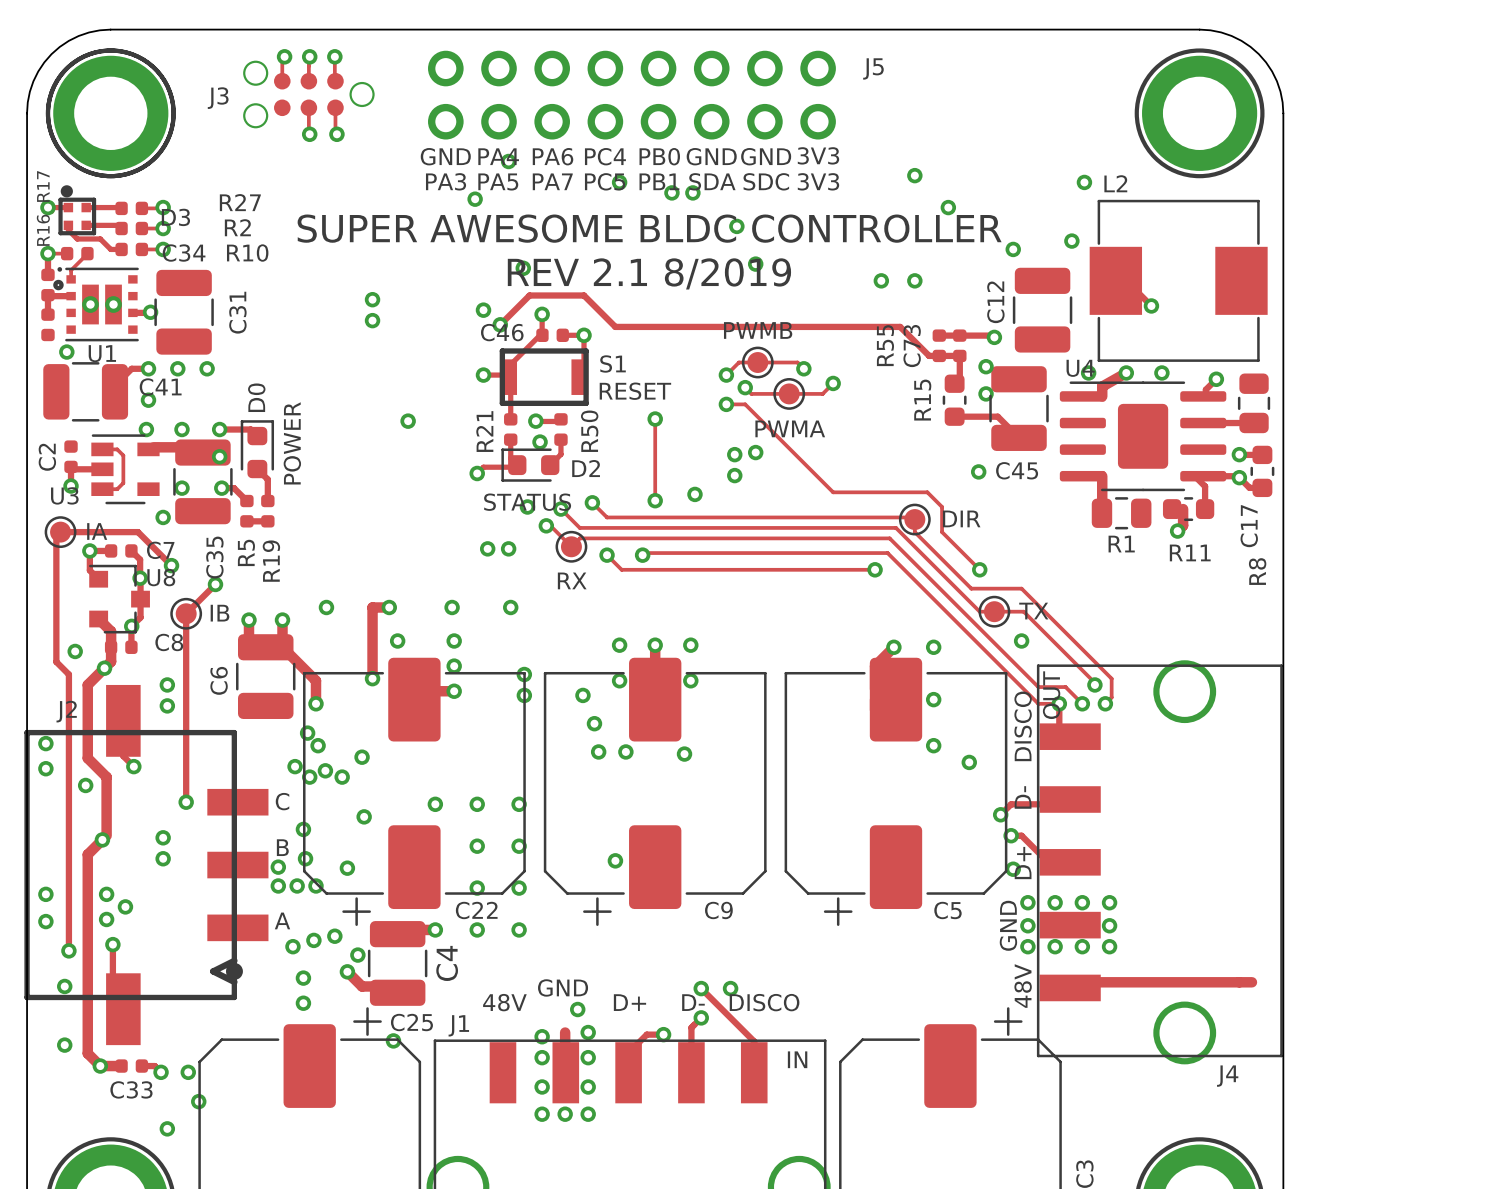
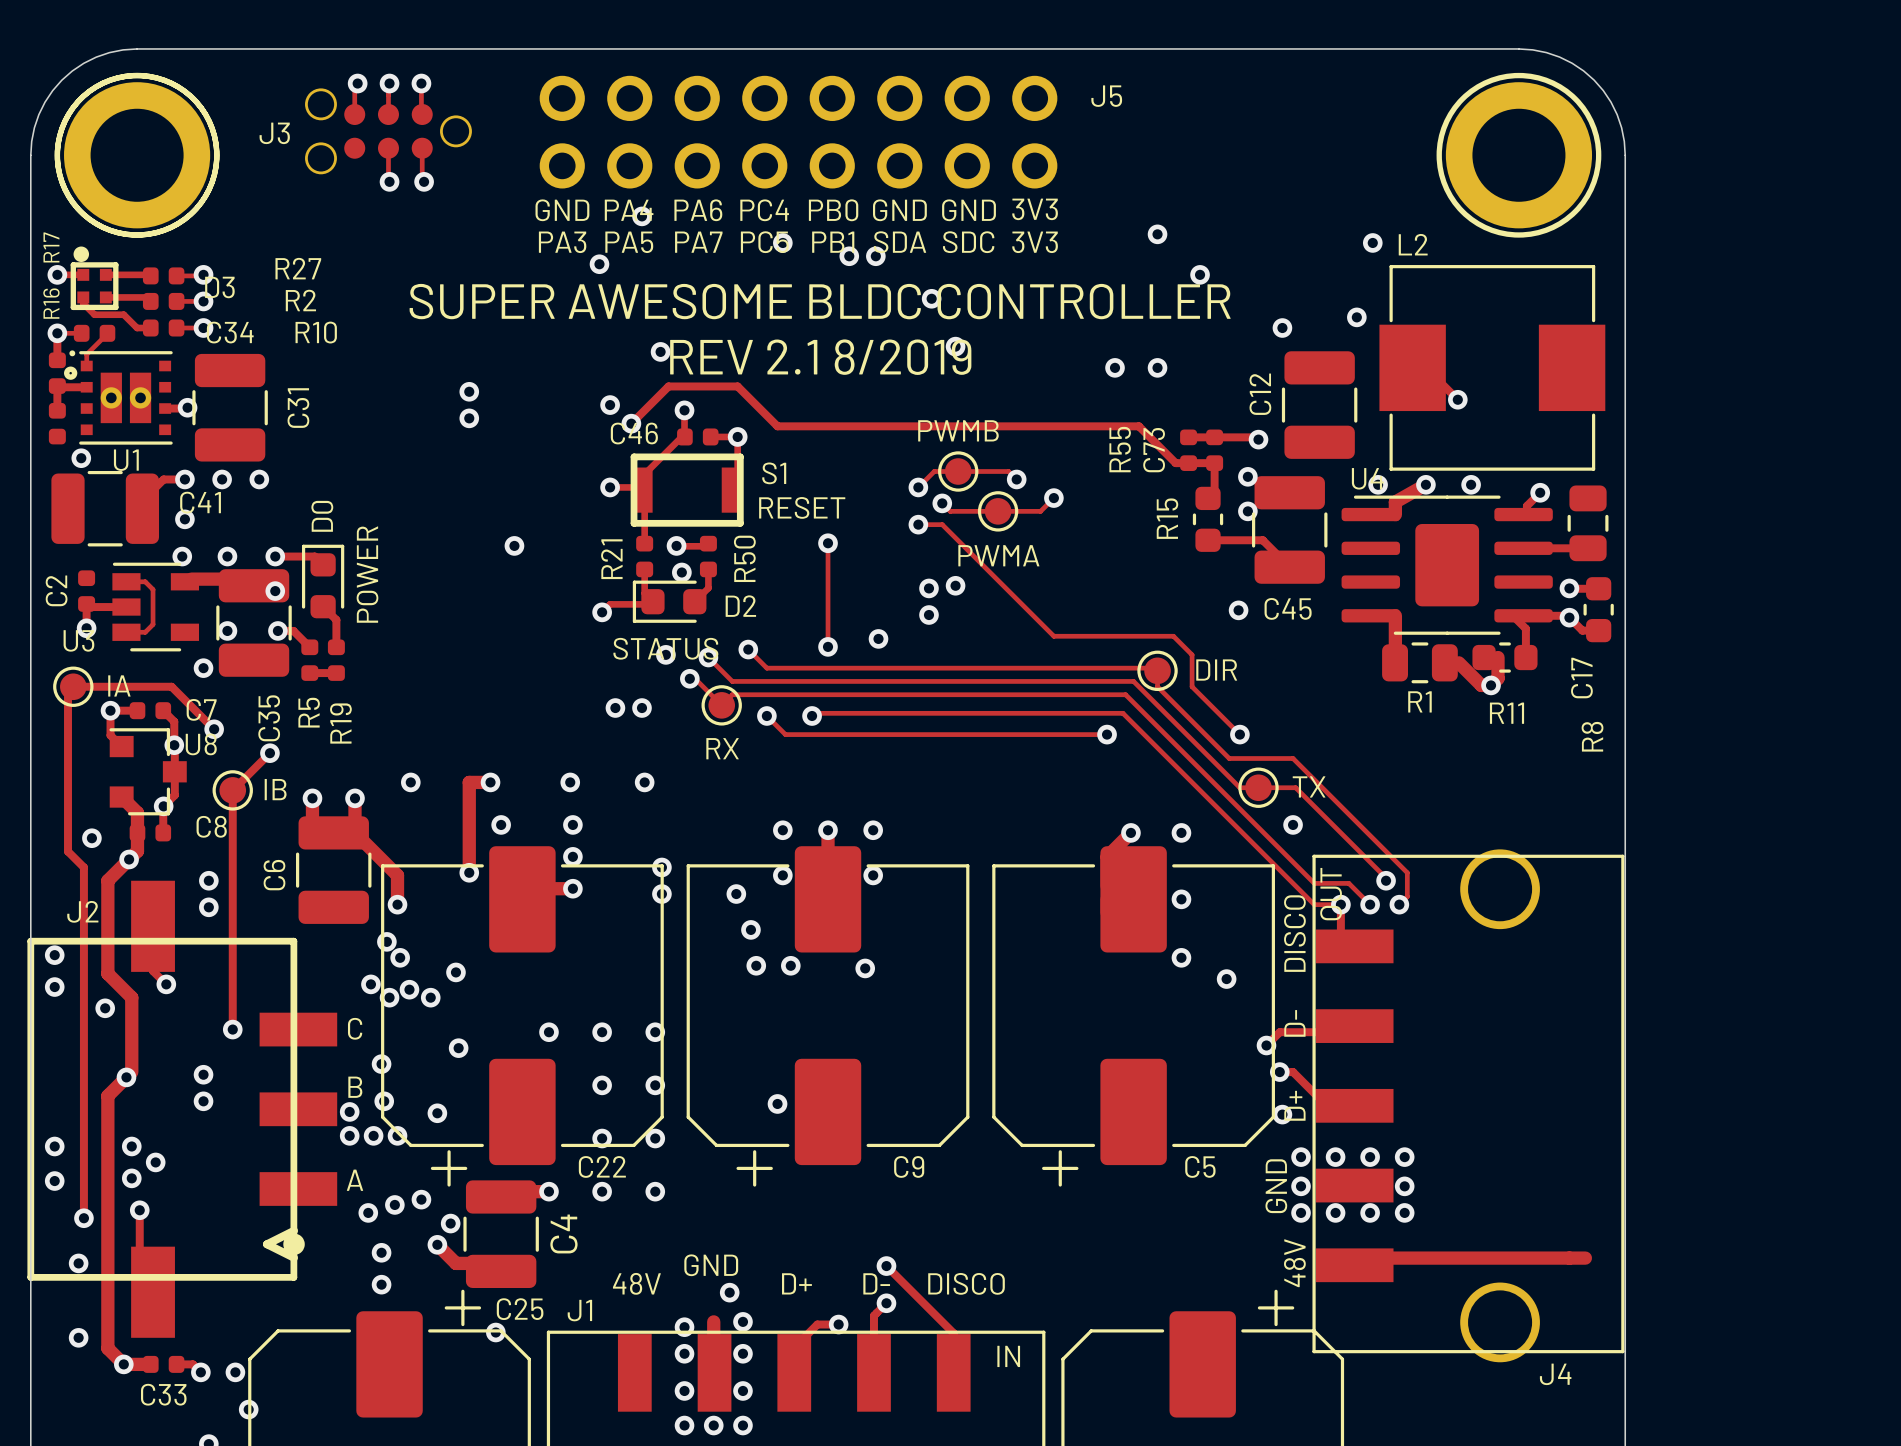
track: none -> (1458, 662) (1481, 685) (1491, 685)
via: (730, 988) -> none

